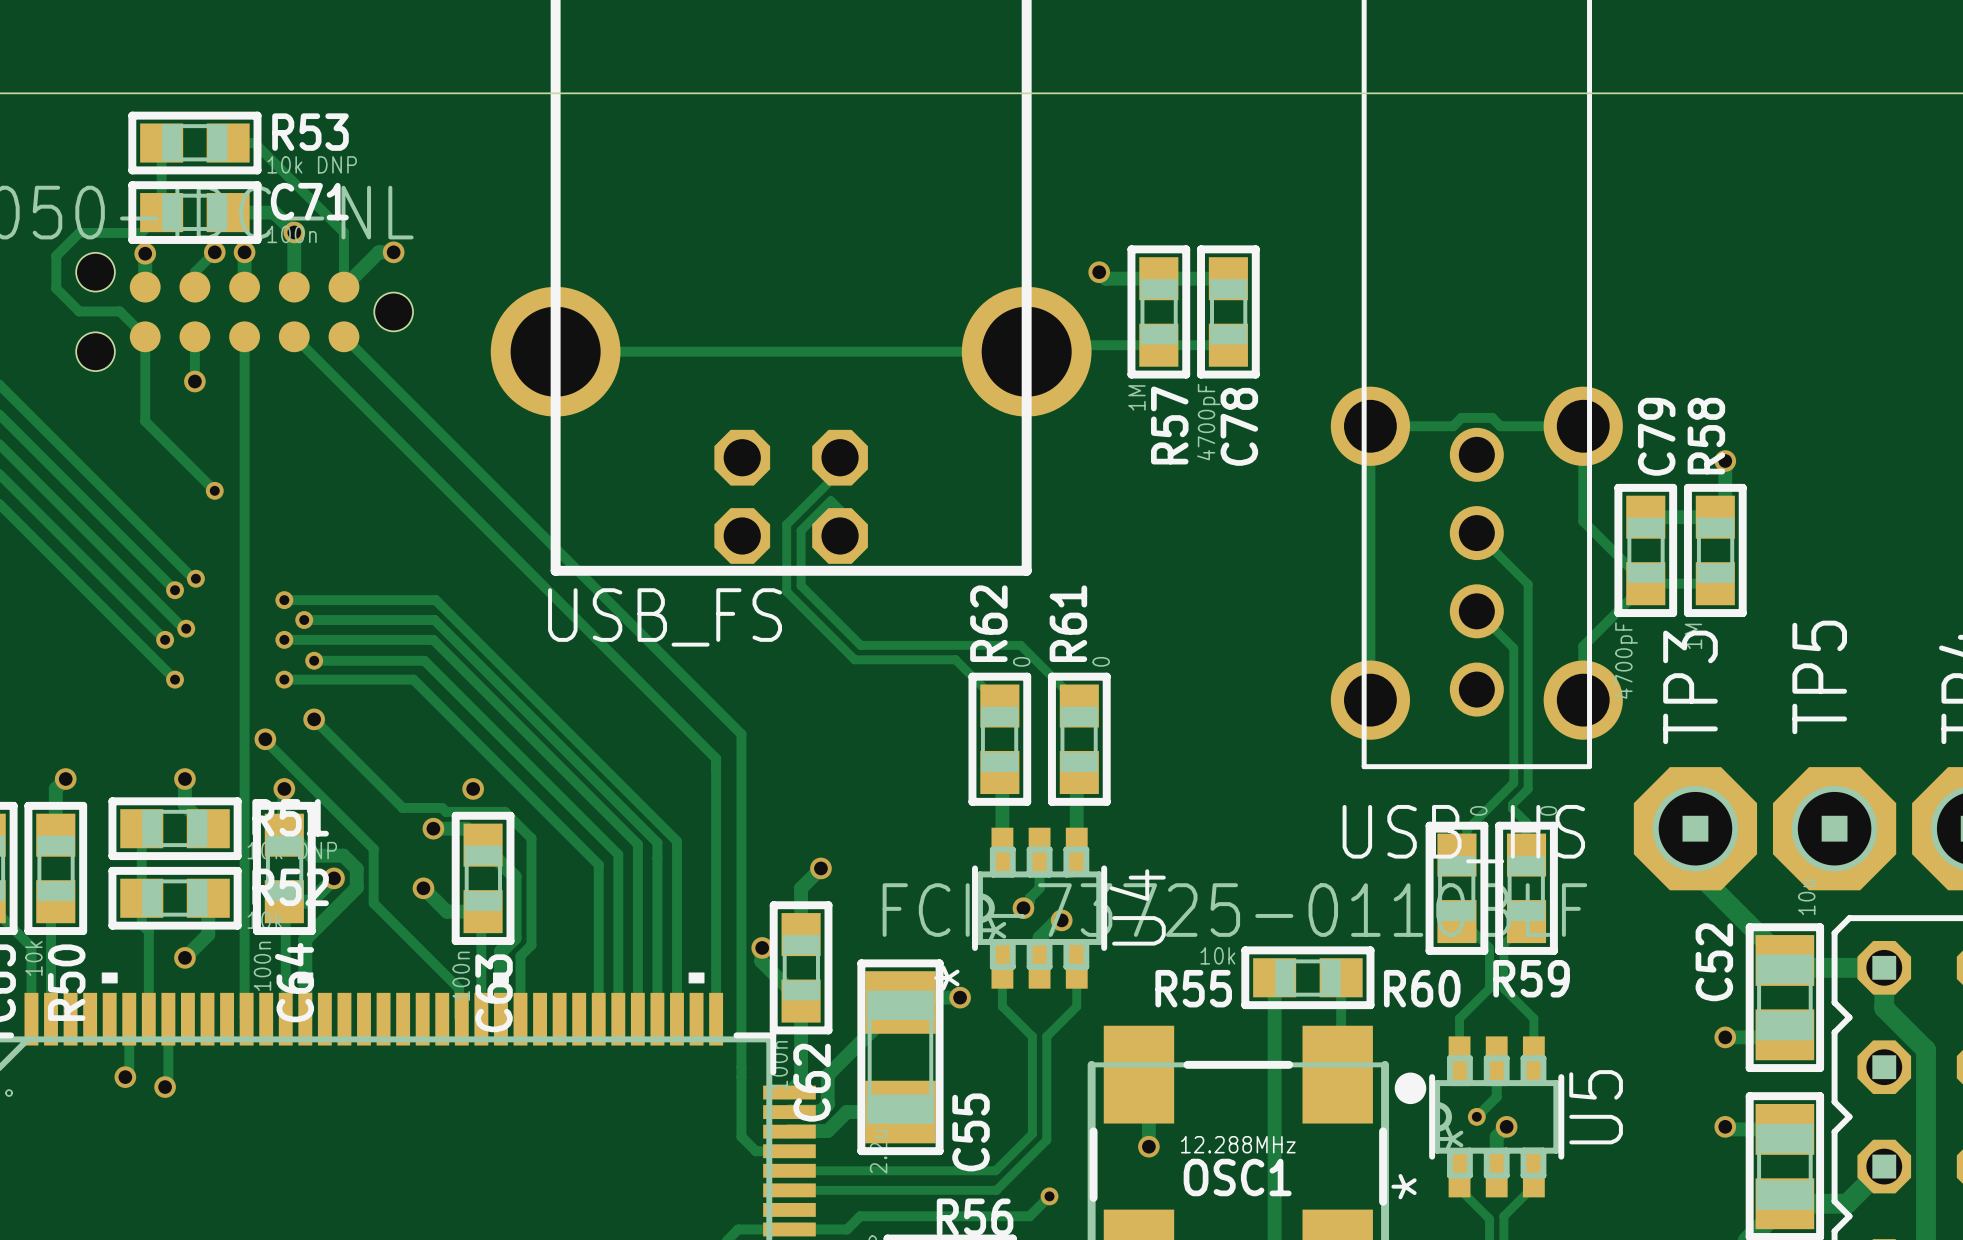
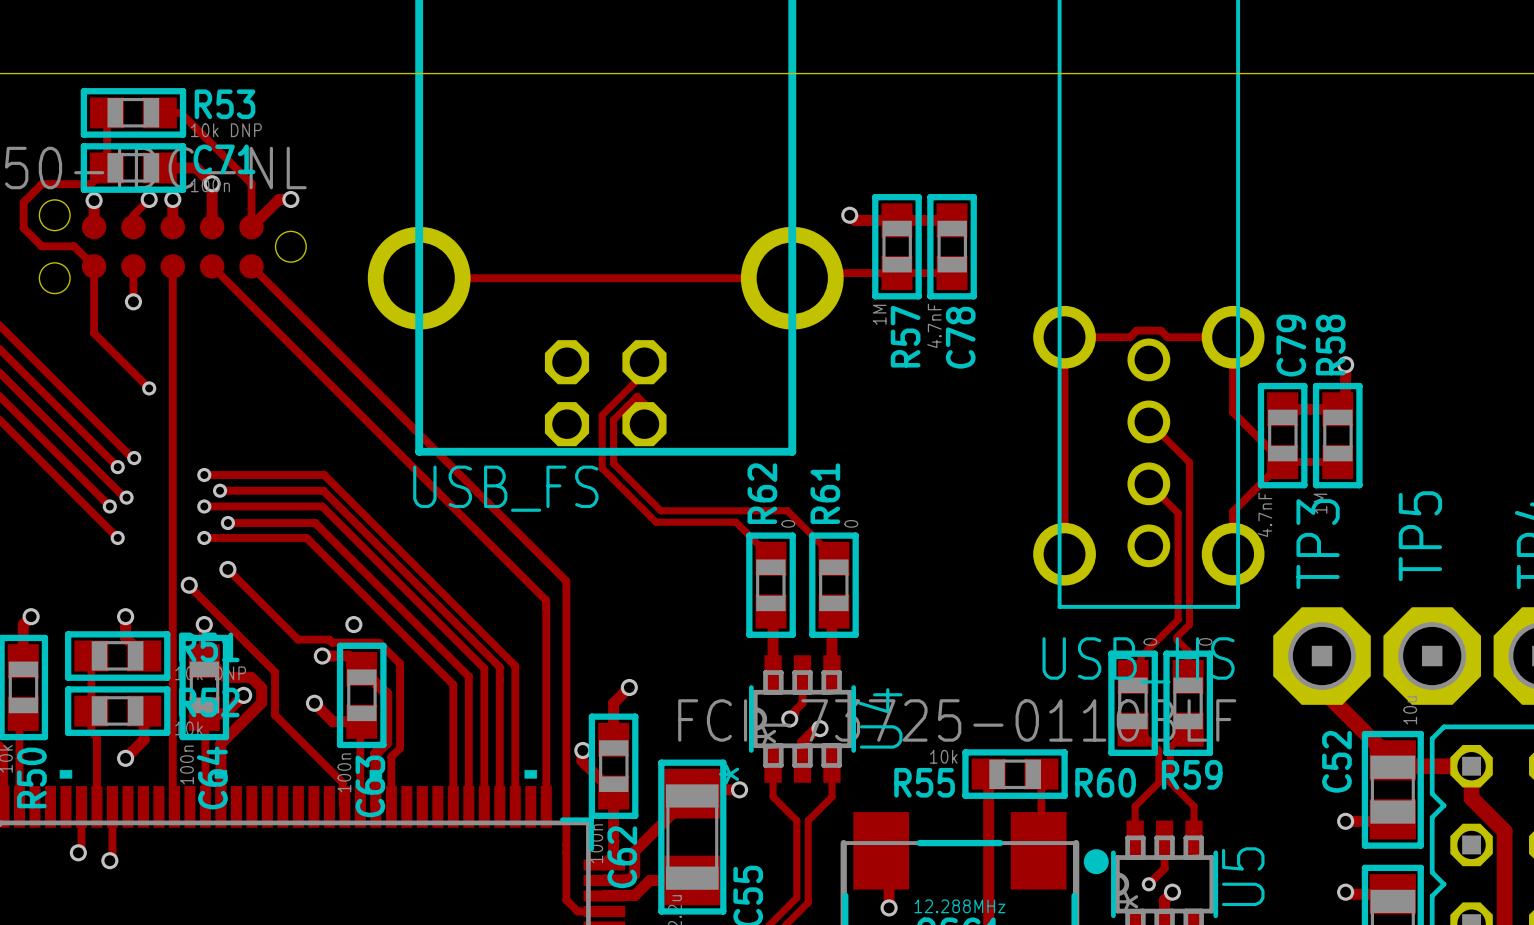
C78 value: 4700pF (1208, 422) -> 4.7nF (934, 325)
C79 value: 4700pF (1626, 660) -> 4.7nF (1265, 514)

